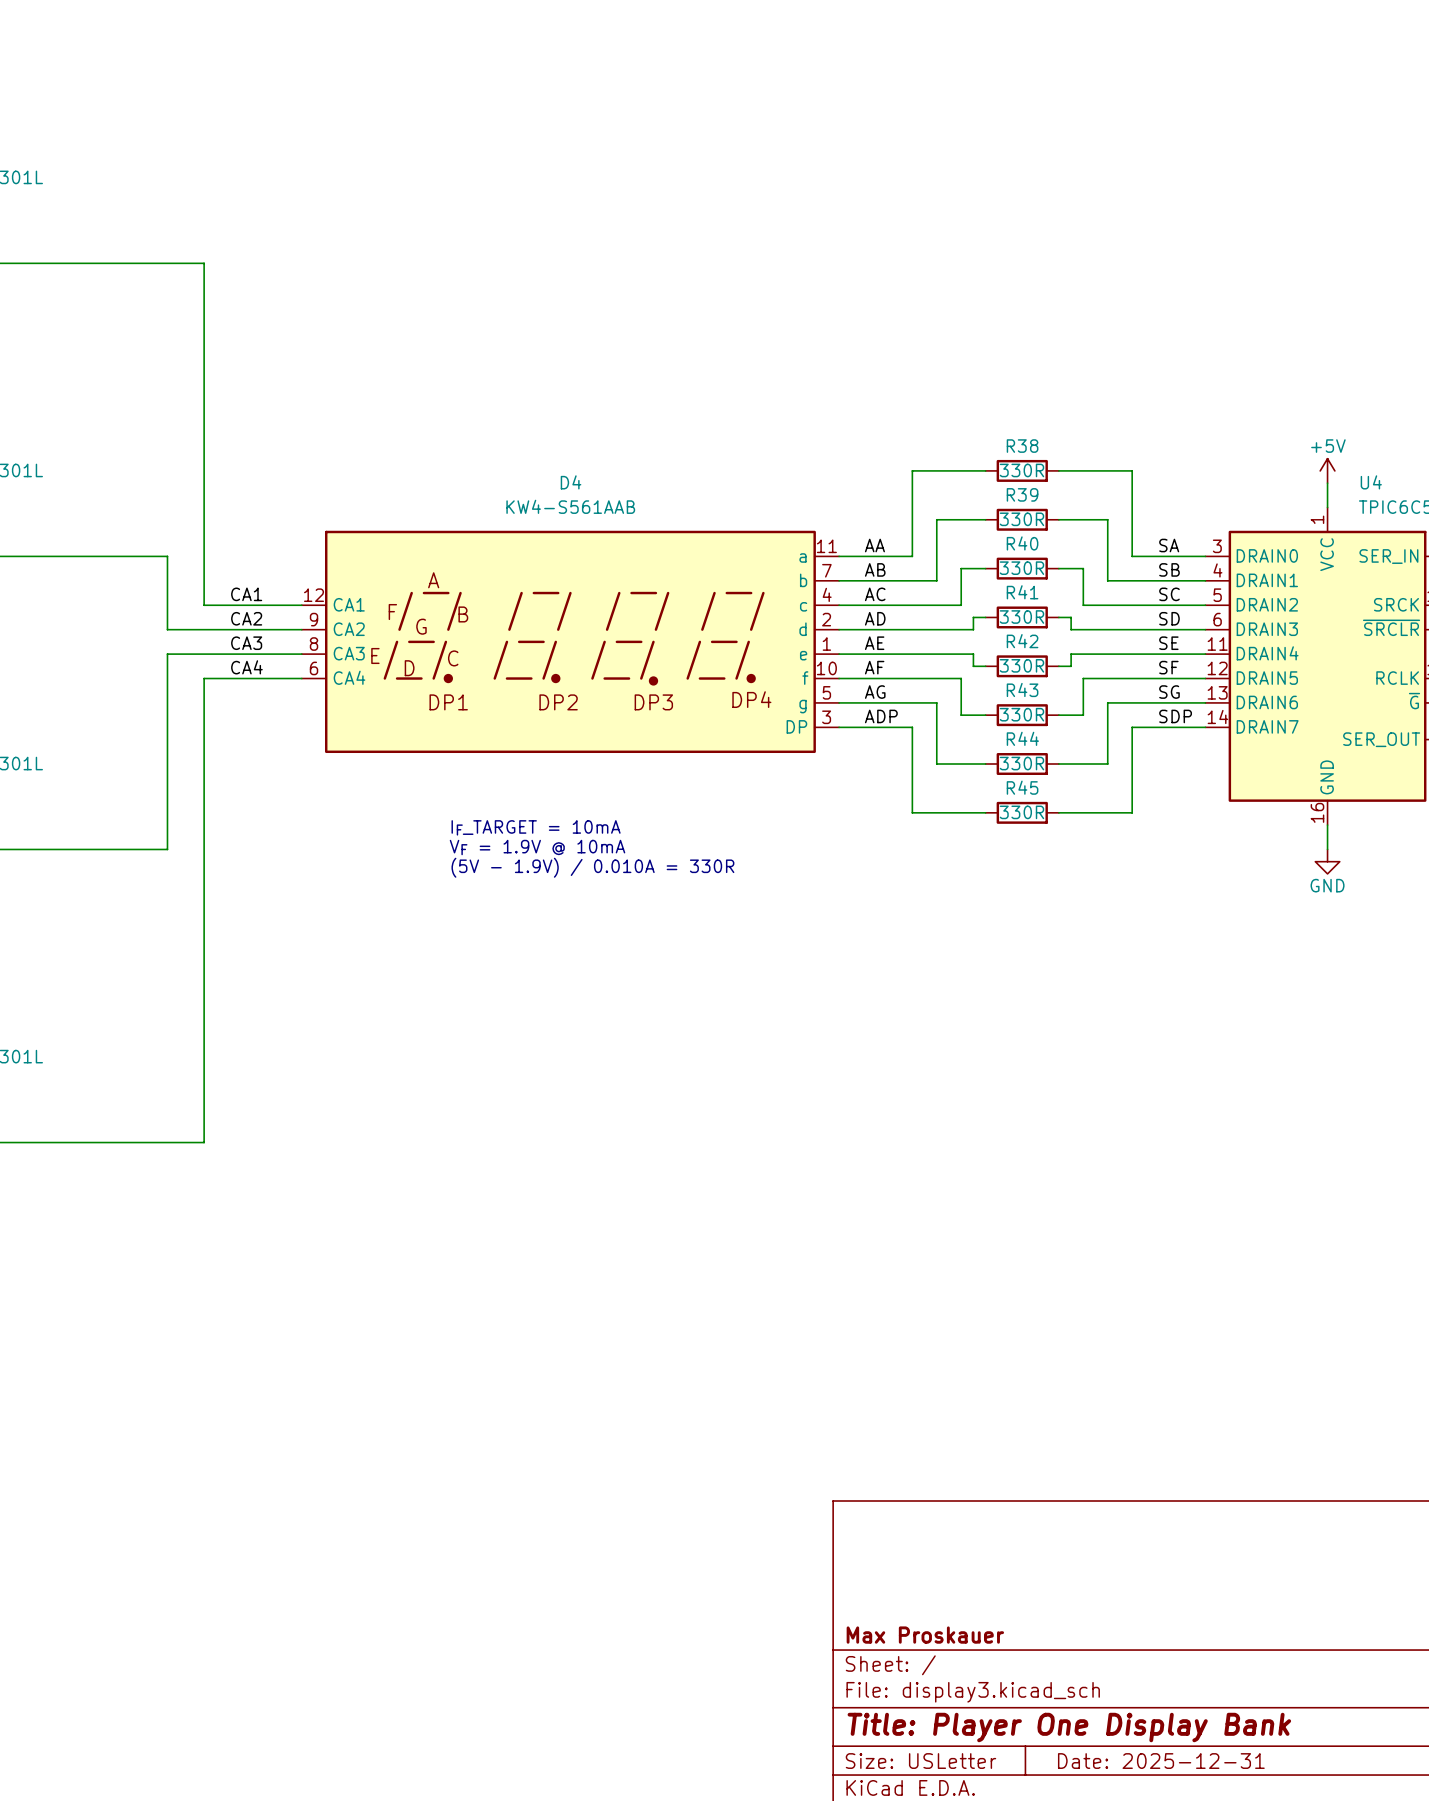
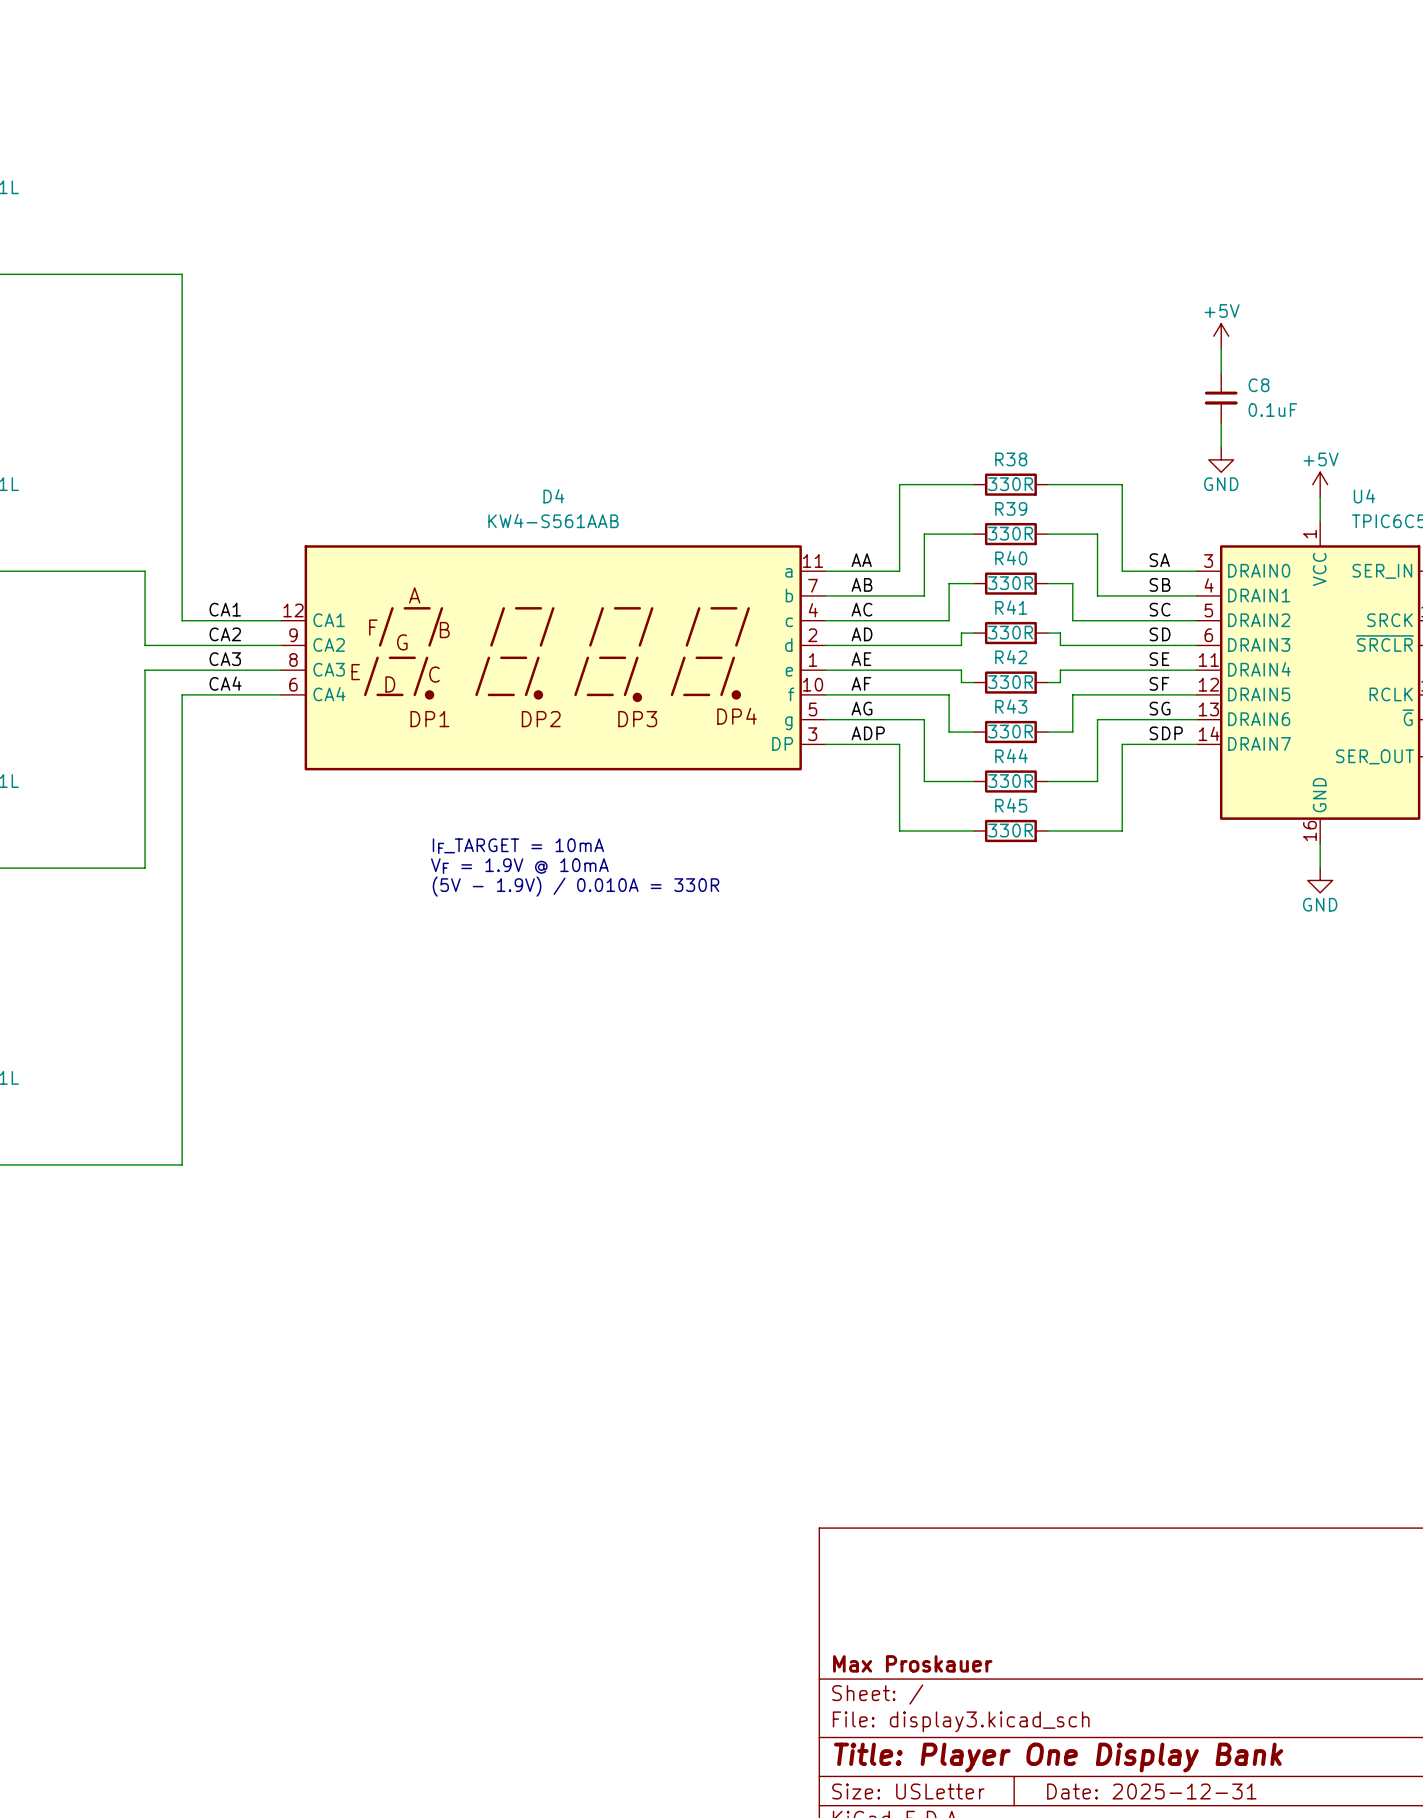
power symbol: none -> +5V (1221, 336)
wire: none -> (1221, 348) (1221, 373)
C8: none -> 0.1uF (1221, 398)
wire: none -> (1221, 422) (1221, 447)
power symbol: none -> GND (1221, 459)

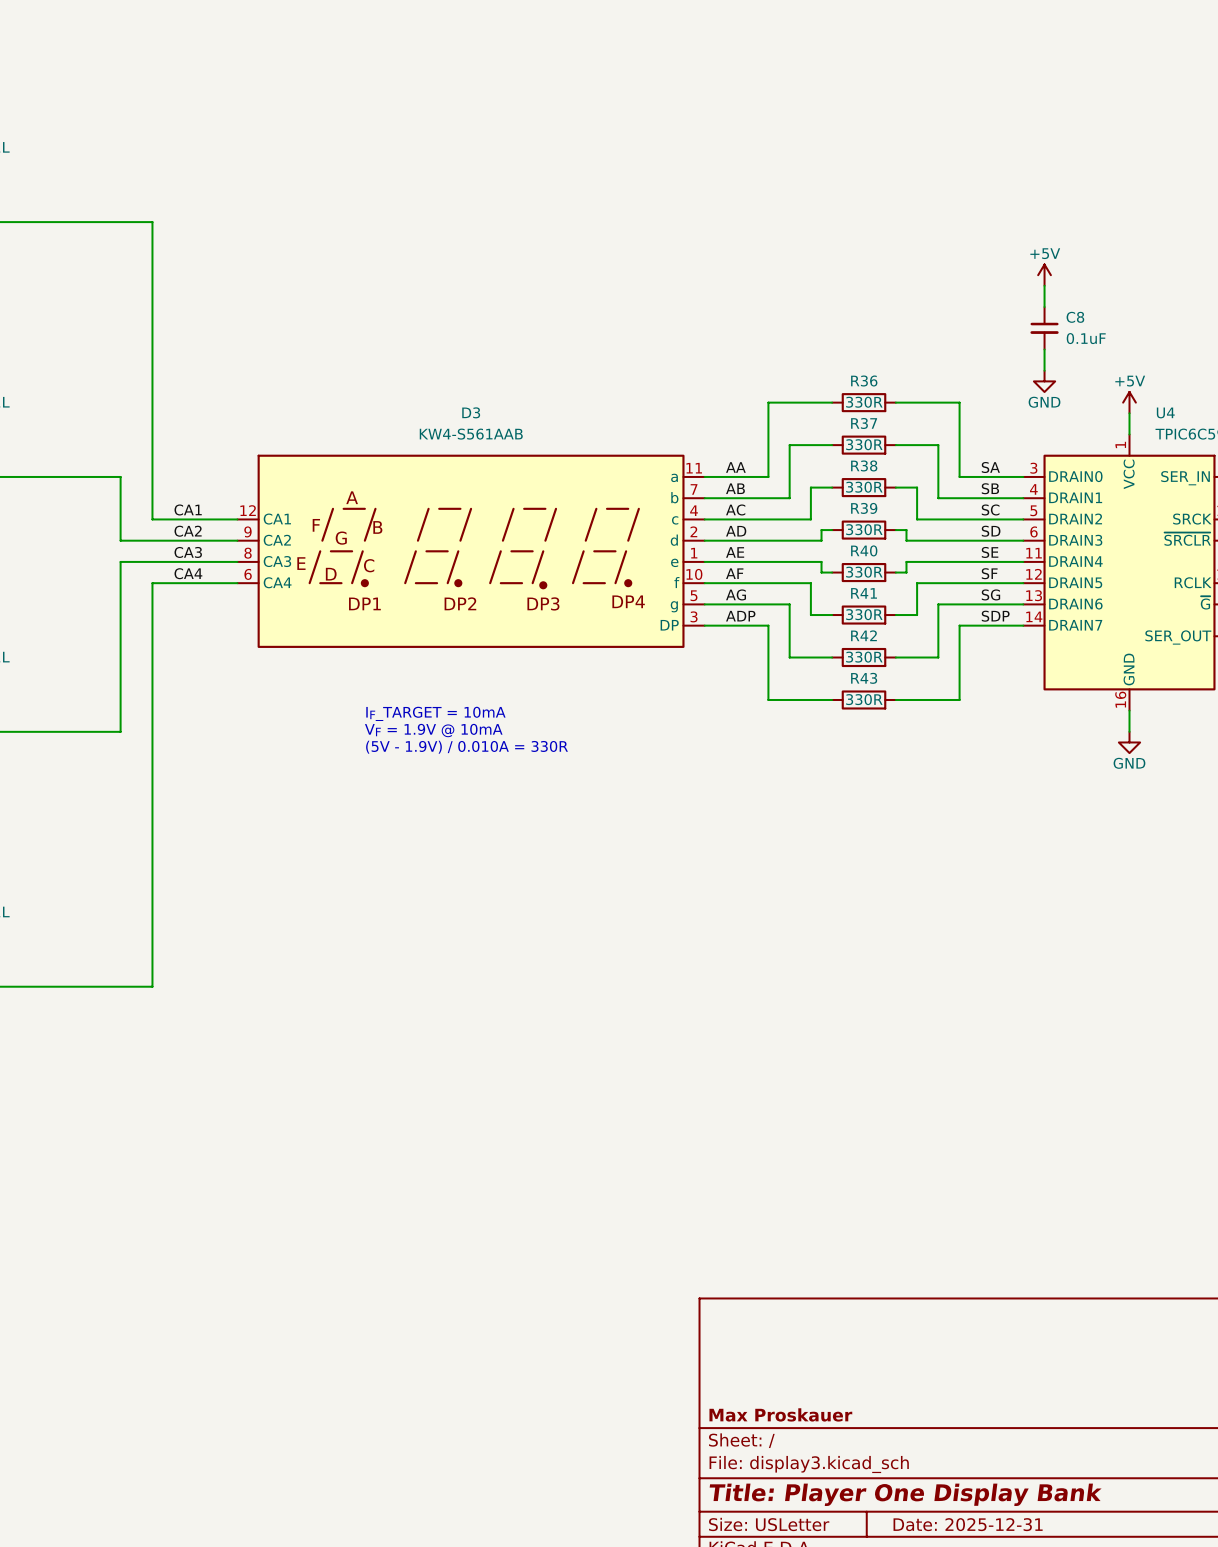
R38 name: R38 (1011, 459) -> R36 (864, 381)
D4 name: D4 (553, 496) -> D3 (471, 412)
R39 name: R39 (1011, 508) -> R37 (864, 423)
R40 name: R40 (1011, 558) -> R38 (864, 465)
R41 name: R41 (1011, 607) -> R39 (864, 508)
R42 name: R42 (1011, 657) -> R40 (864, 550)
R43 name: R43 (1011, 706) -> R41 (864, 593)
R44 name: R44 (1011, 756) -> R42 (863, 635)
R45 name: R45 (1011, 805) -> R43 (864, 678)

